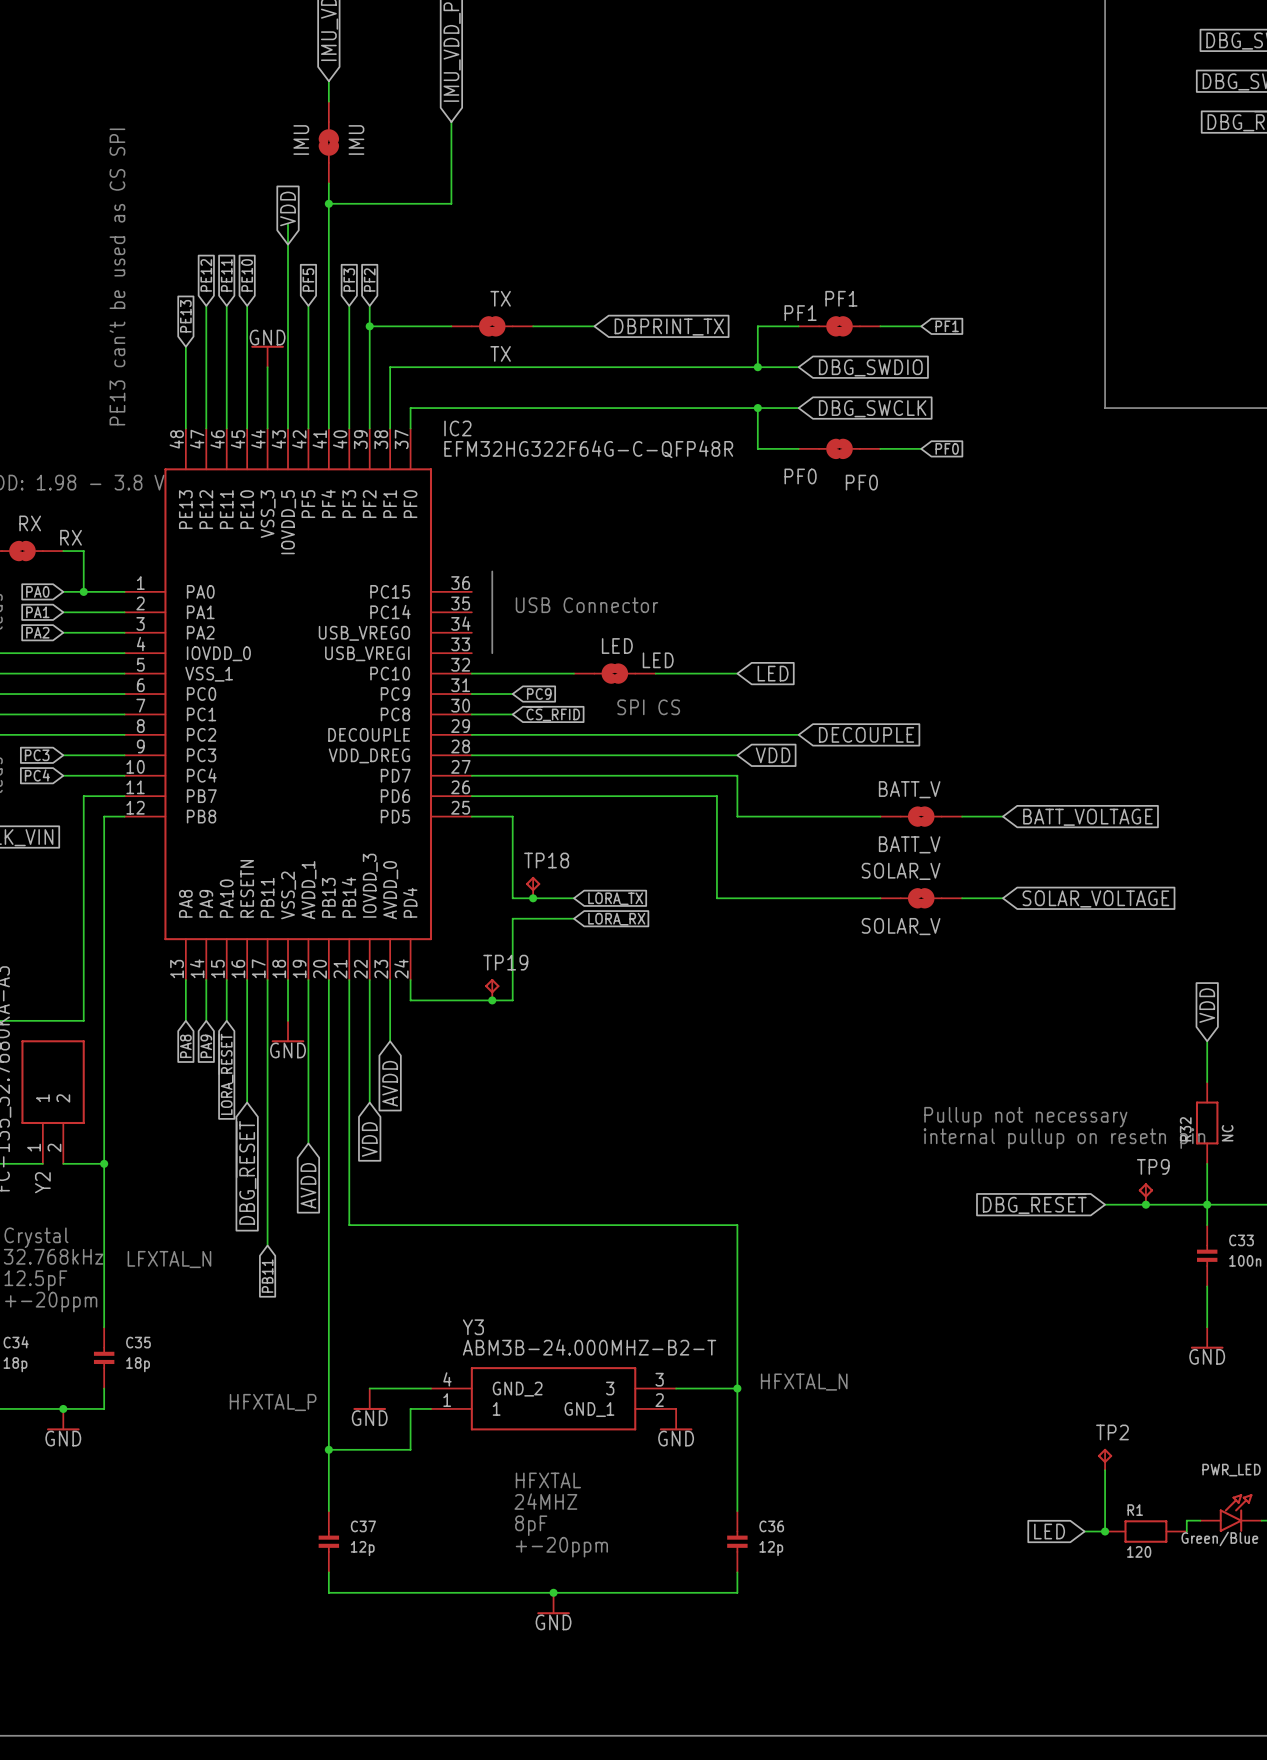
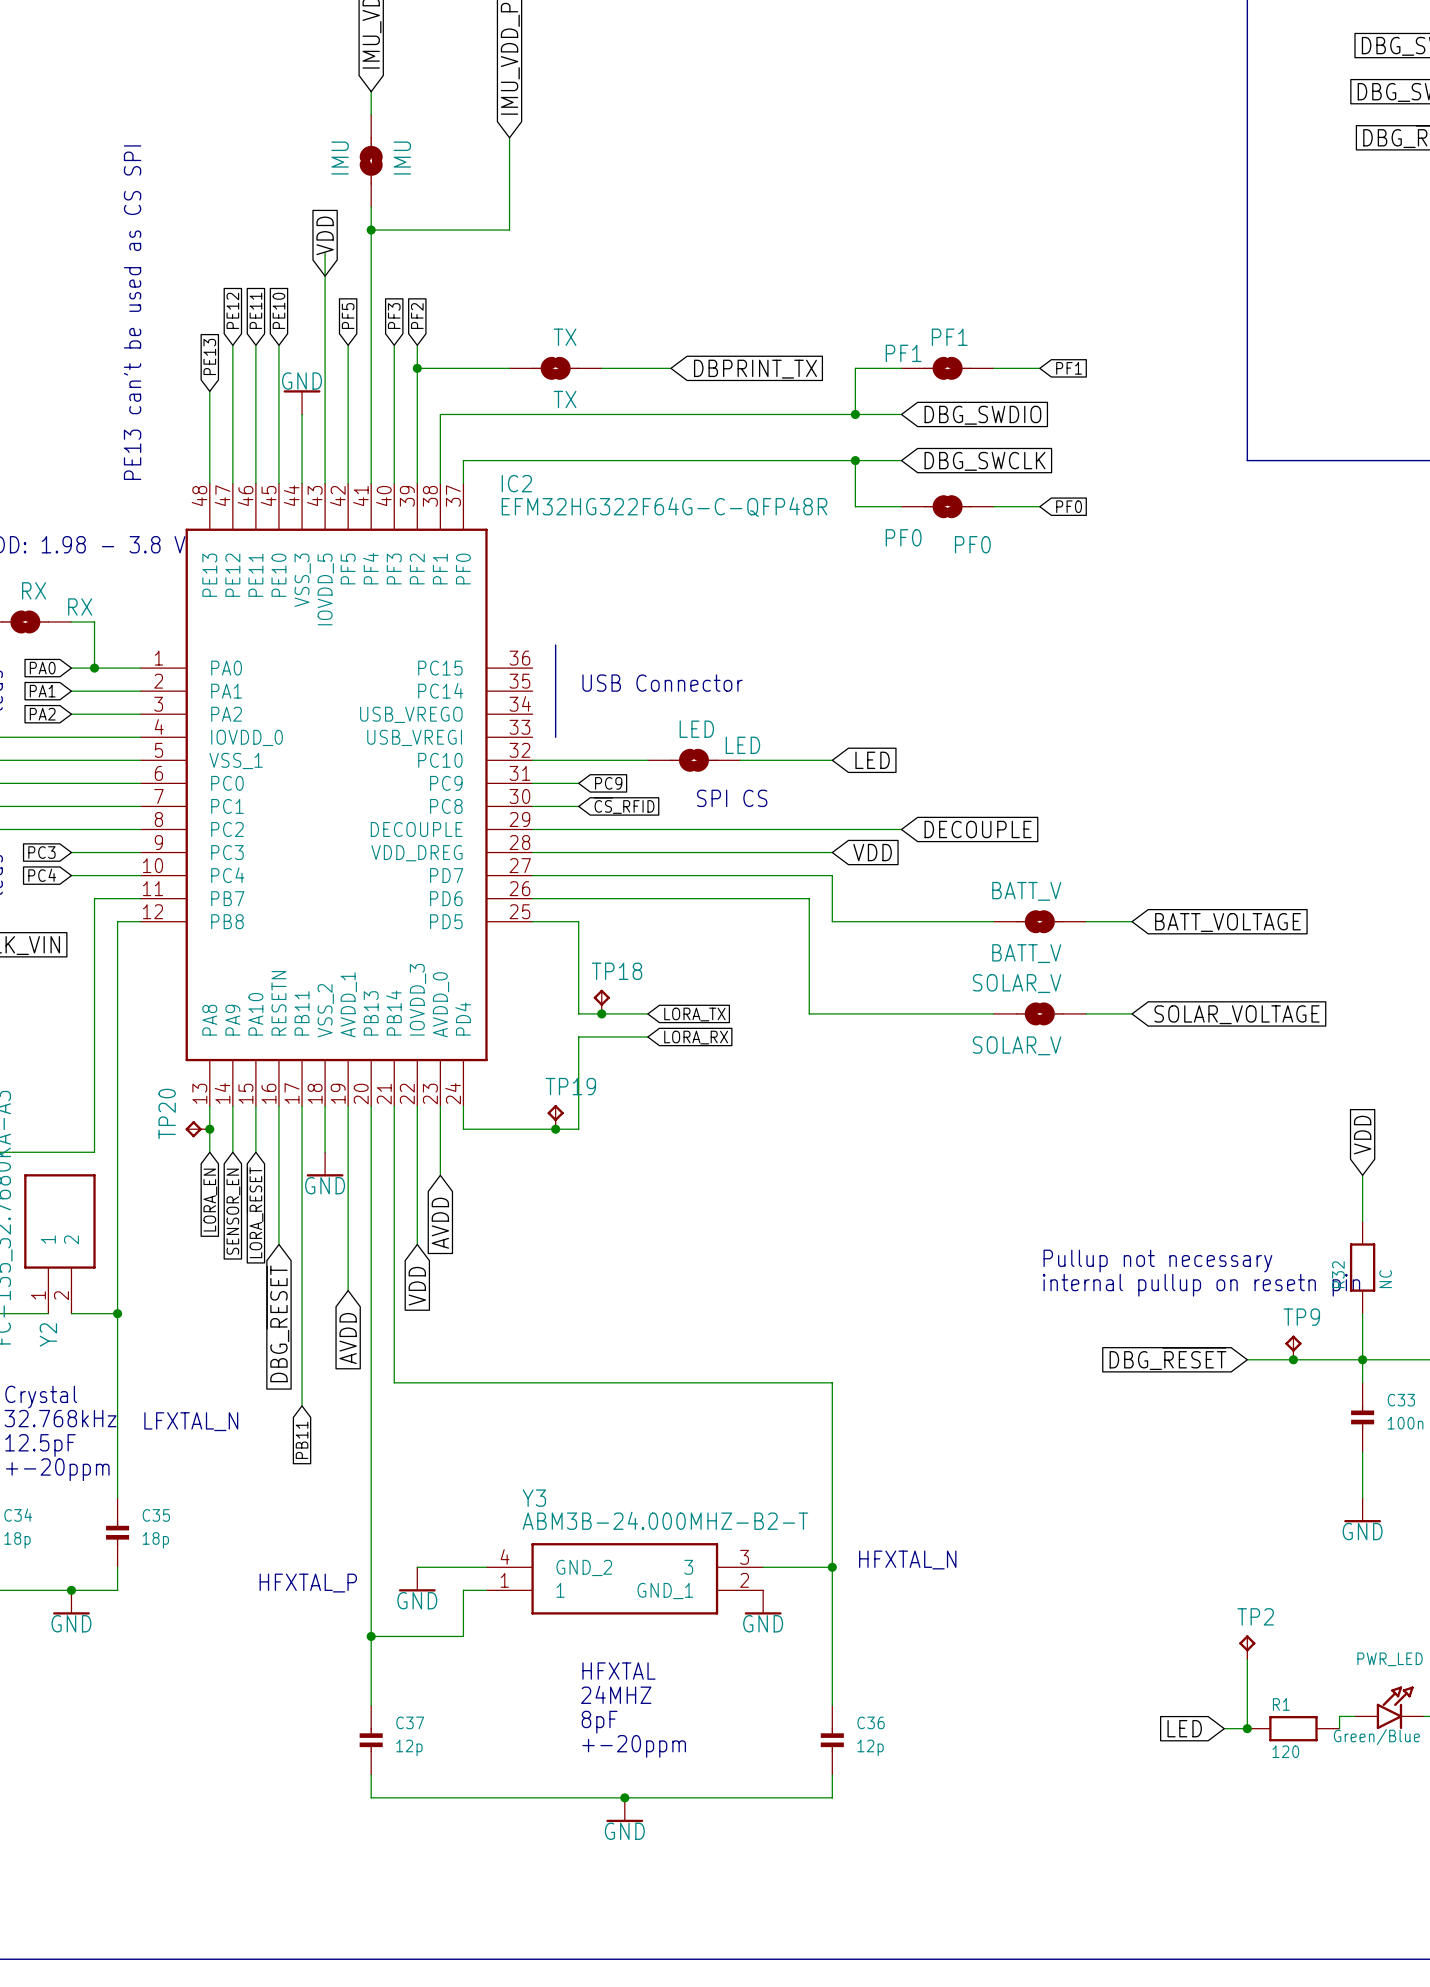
TP20: none -> (197, 1129)
junction: none -> (209, 1129)
global label: PA8 (185, 1046) -> LORA_EN (210, 1200)
global label: PA9 (206, 1046) -> SENSOR_EN (233, 1211)

